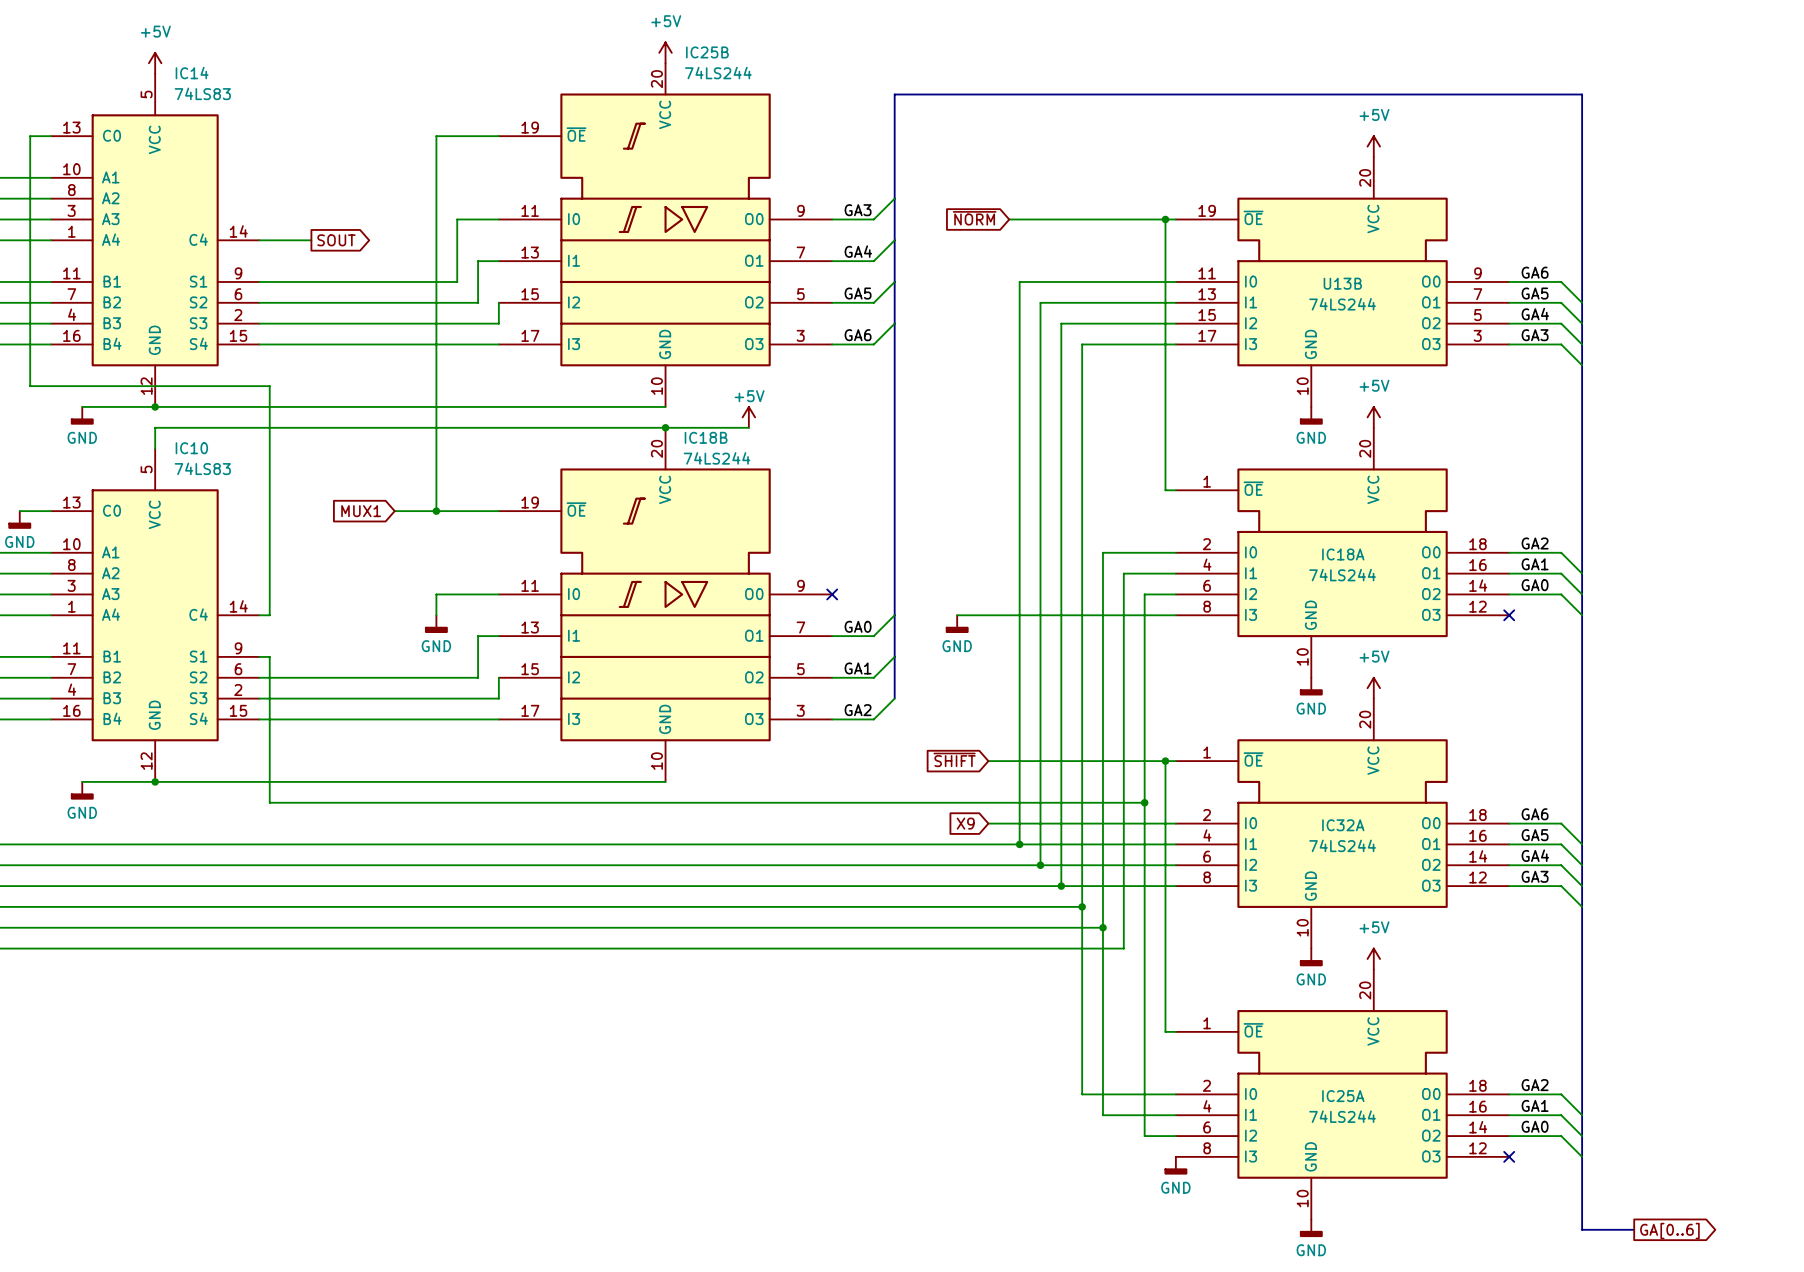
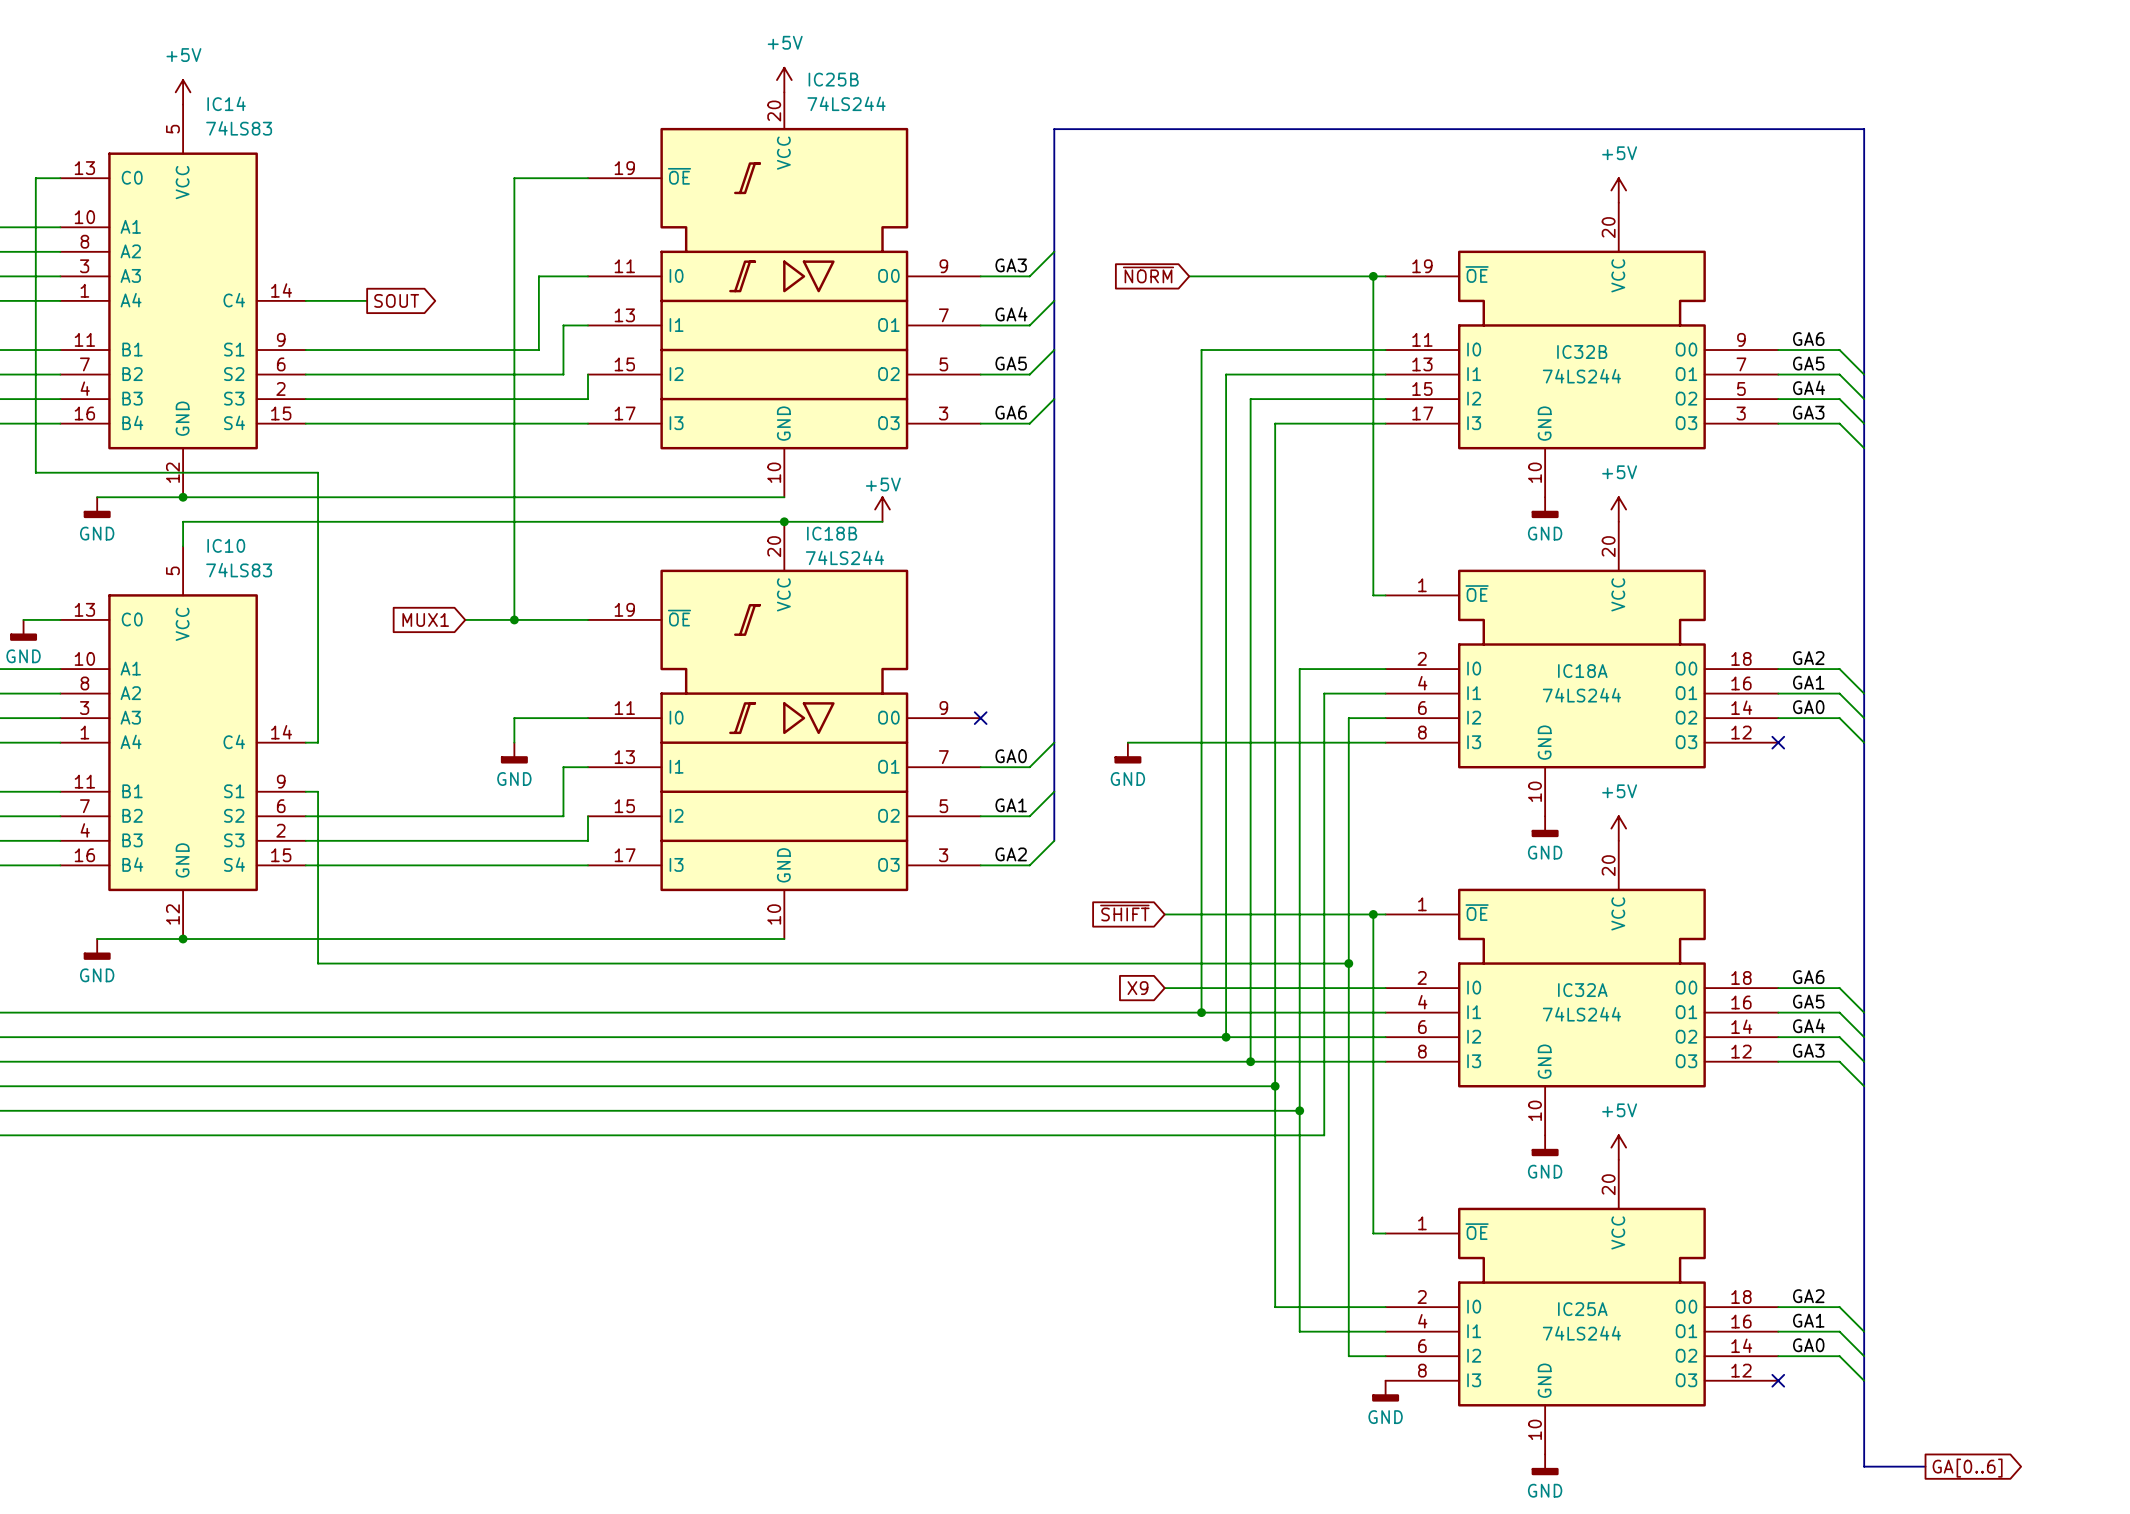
U13B name: U13B (1342, 283) -> IC32B (1582, 352)

